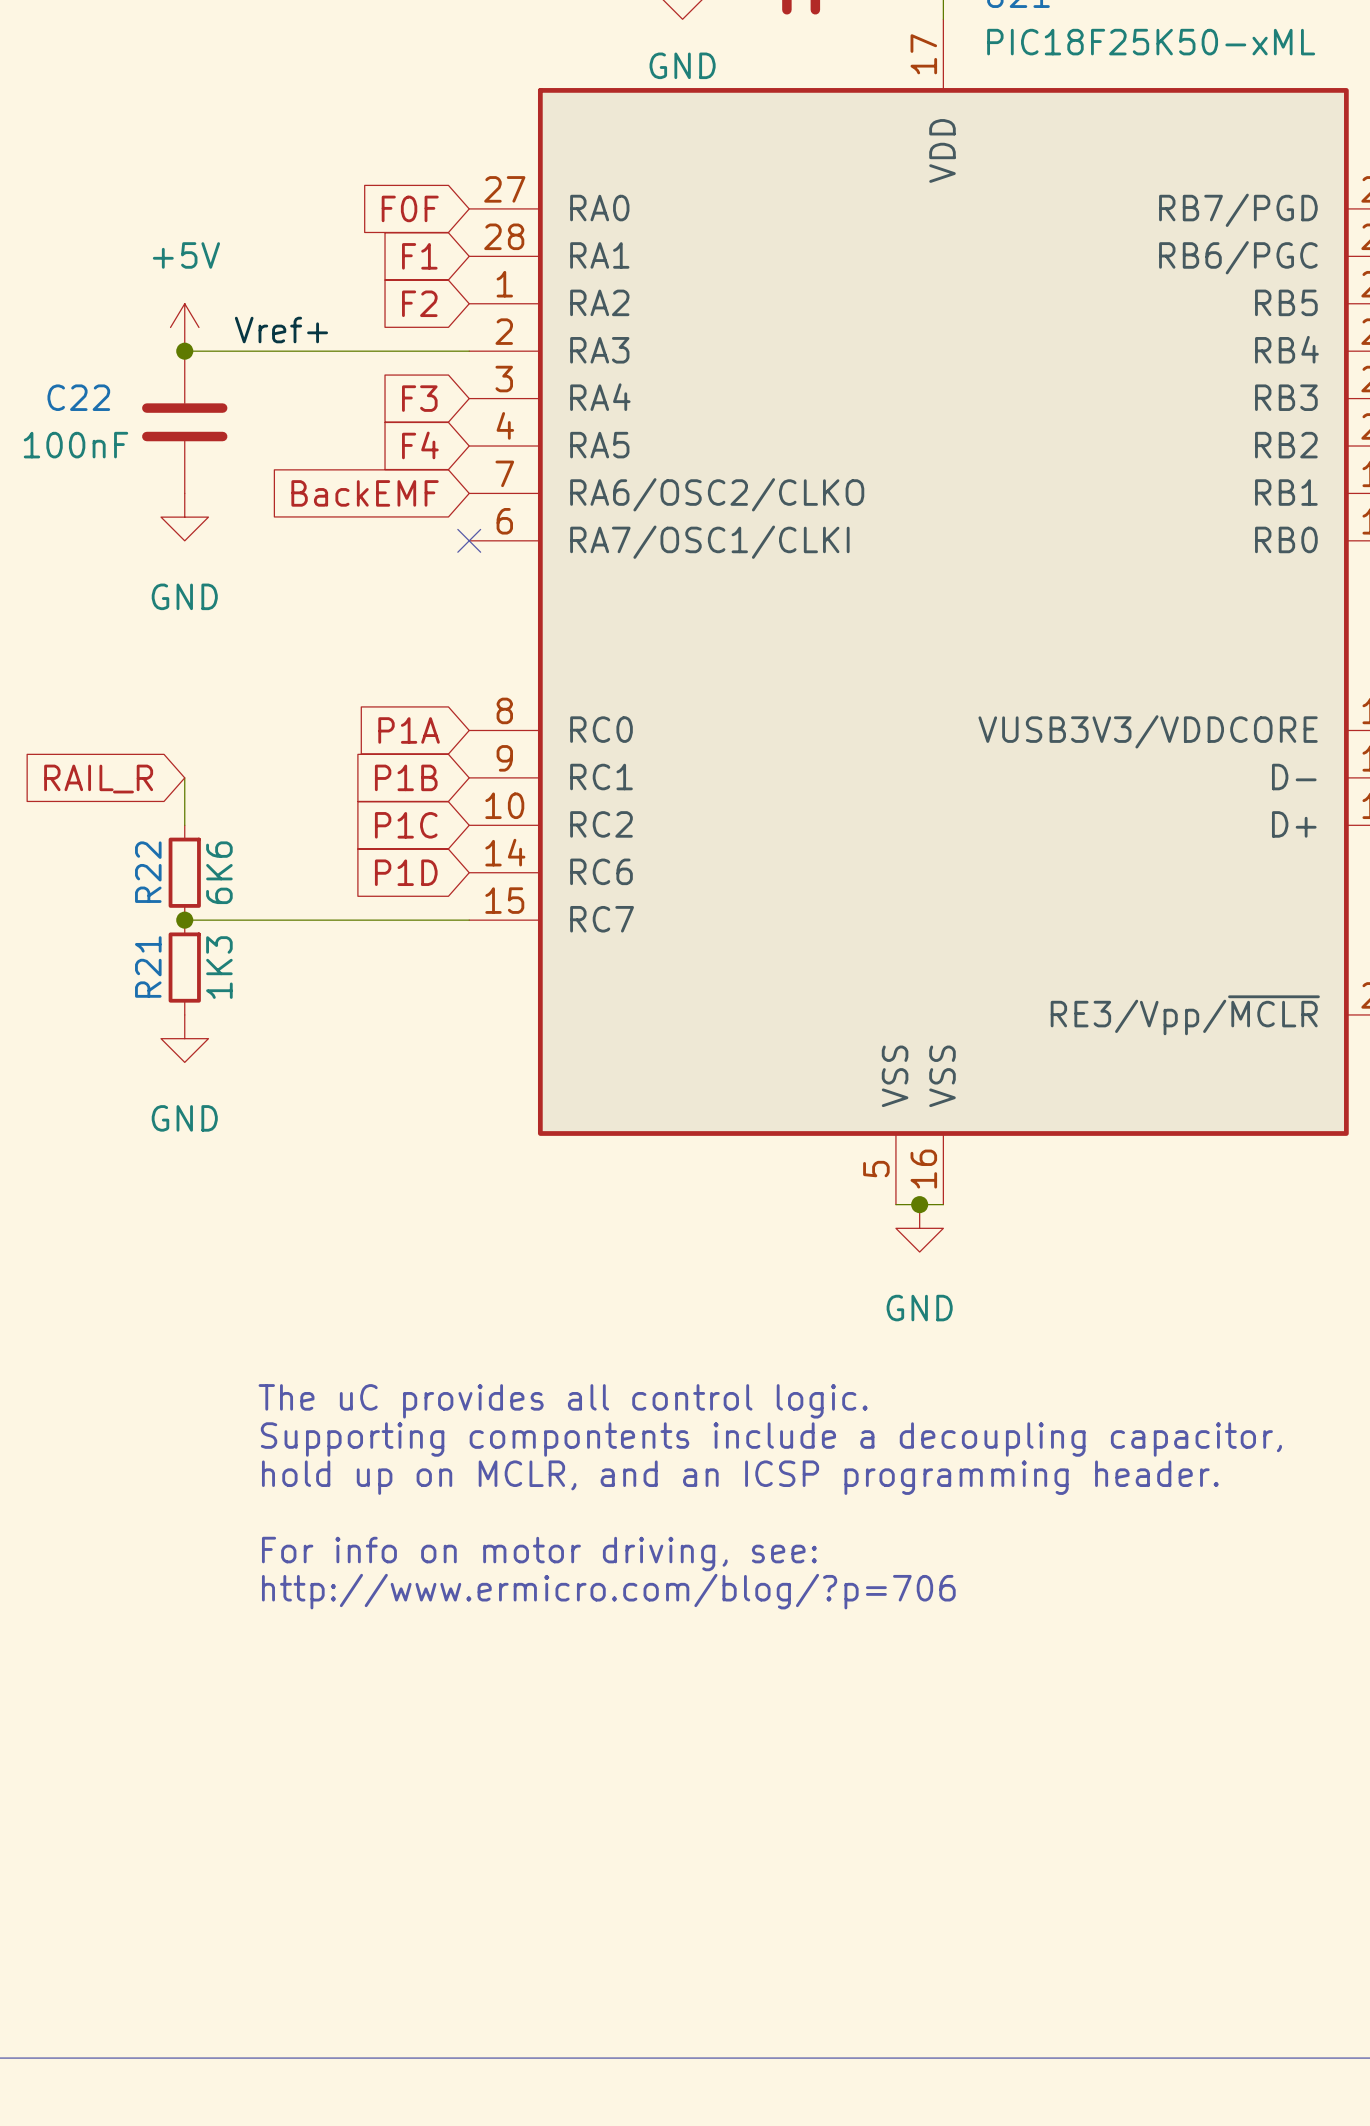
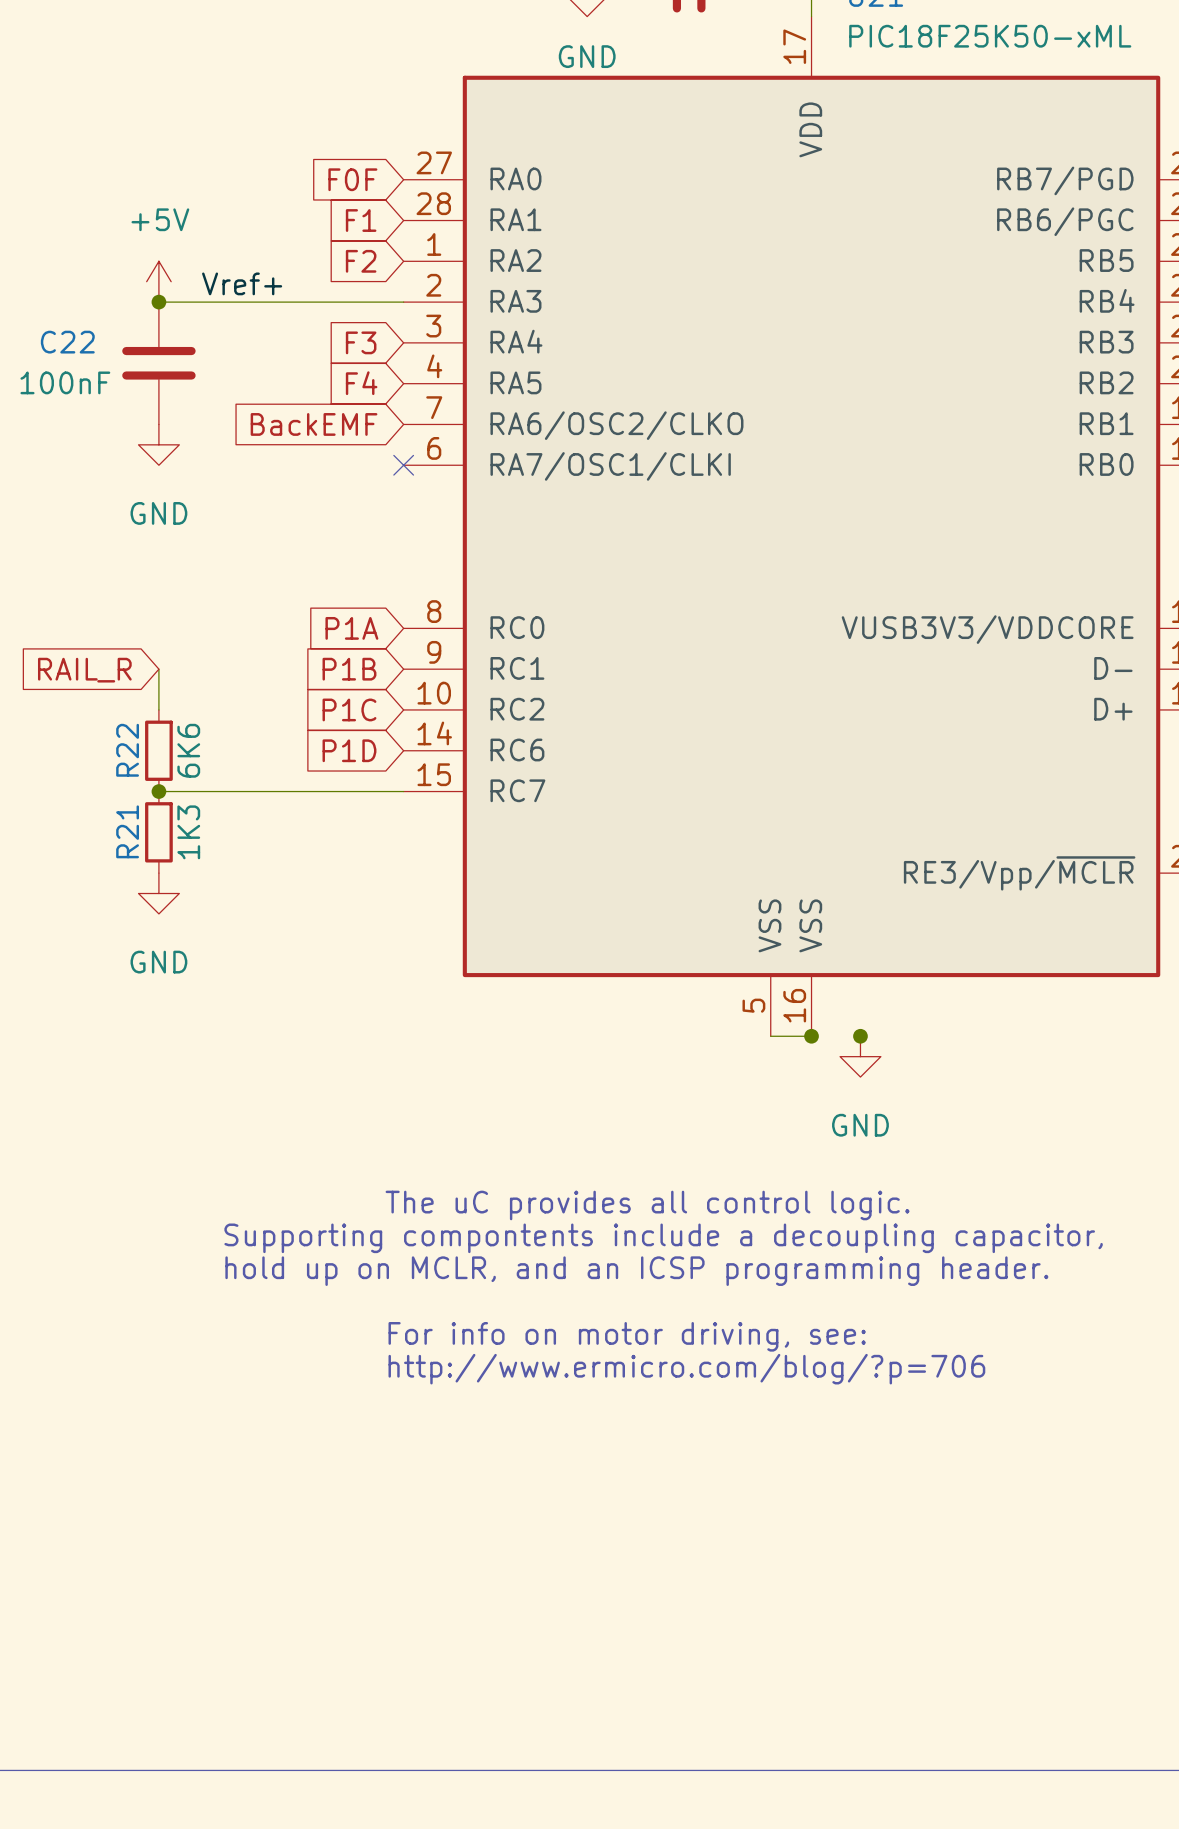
junction position: (919, 1204) -> (811, 1036)
junction: none -> (860, 1036)
power symbol position: GND (919, 1228) -> GND (860, 1056)
text position: The uC provides all control logic. (563, 1401) -> The uC provides all control logic. (647, 1205)
text position: For info on motor driving, see: (539, 1554) -> For info on motor driving, see: (627, 1336)
text position: http://www.ermicro.com/blog/?p=706 (608, 1591) -> http://www.ermicro.com/blog/?p=706 (686, 1369)

